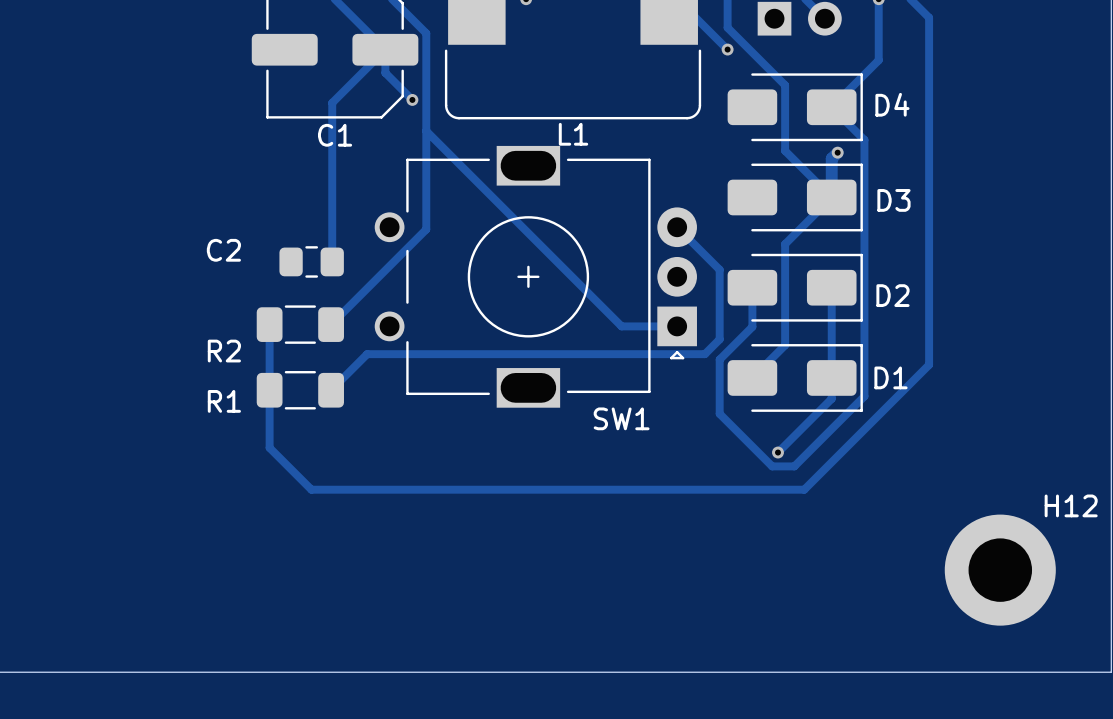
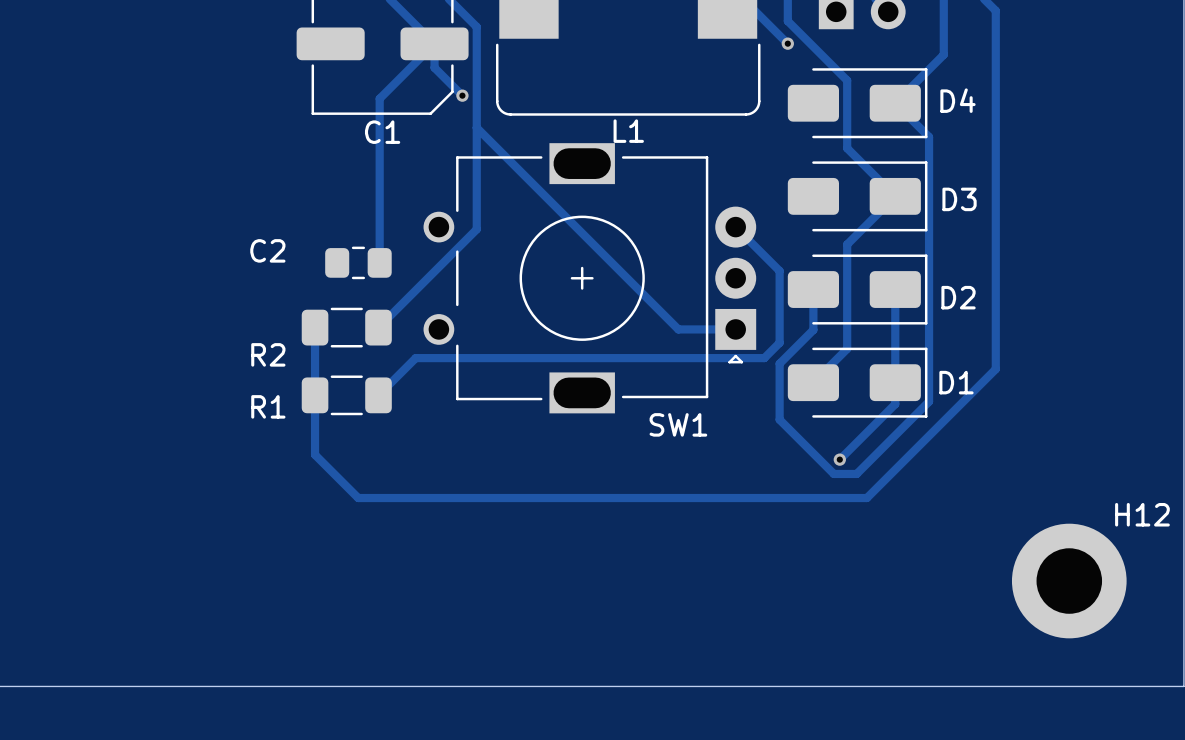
track: (837, 152) (831, 158) (831, 197) -> none
via: (837, 152) -> none

